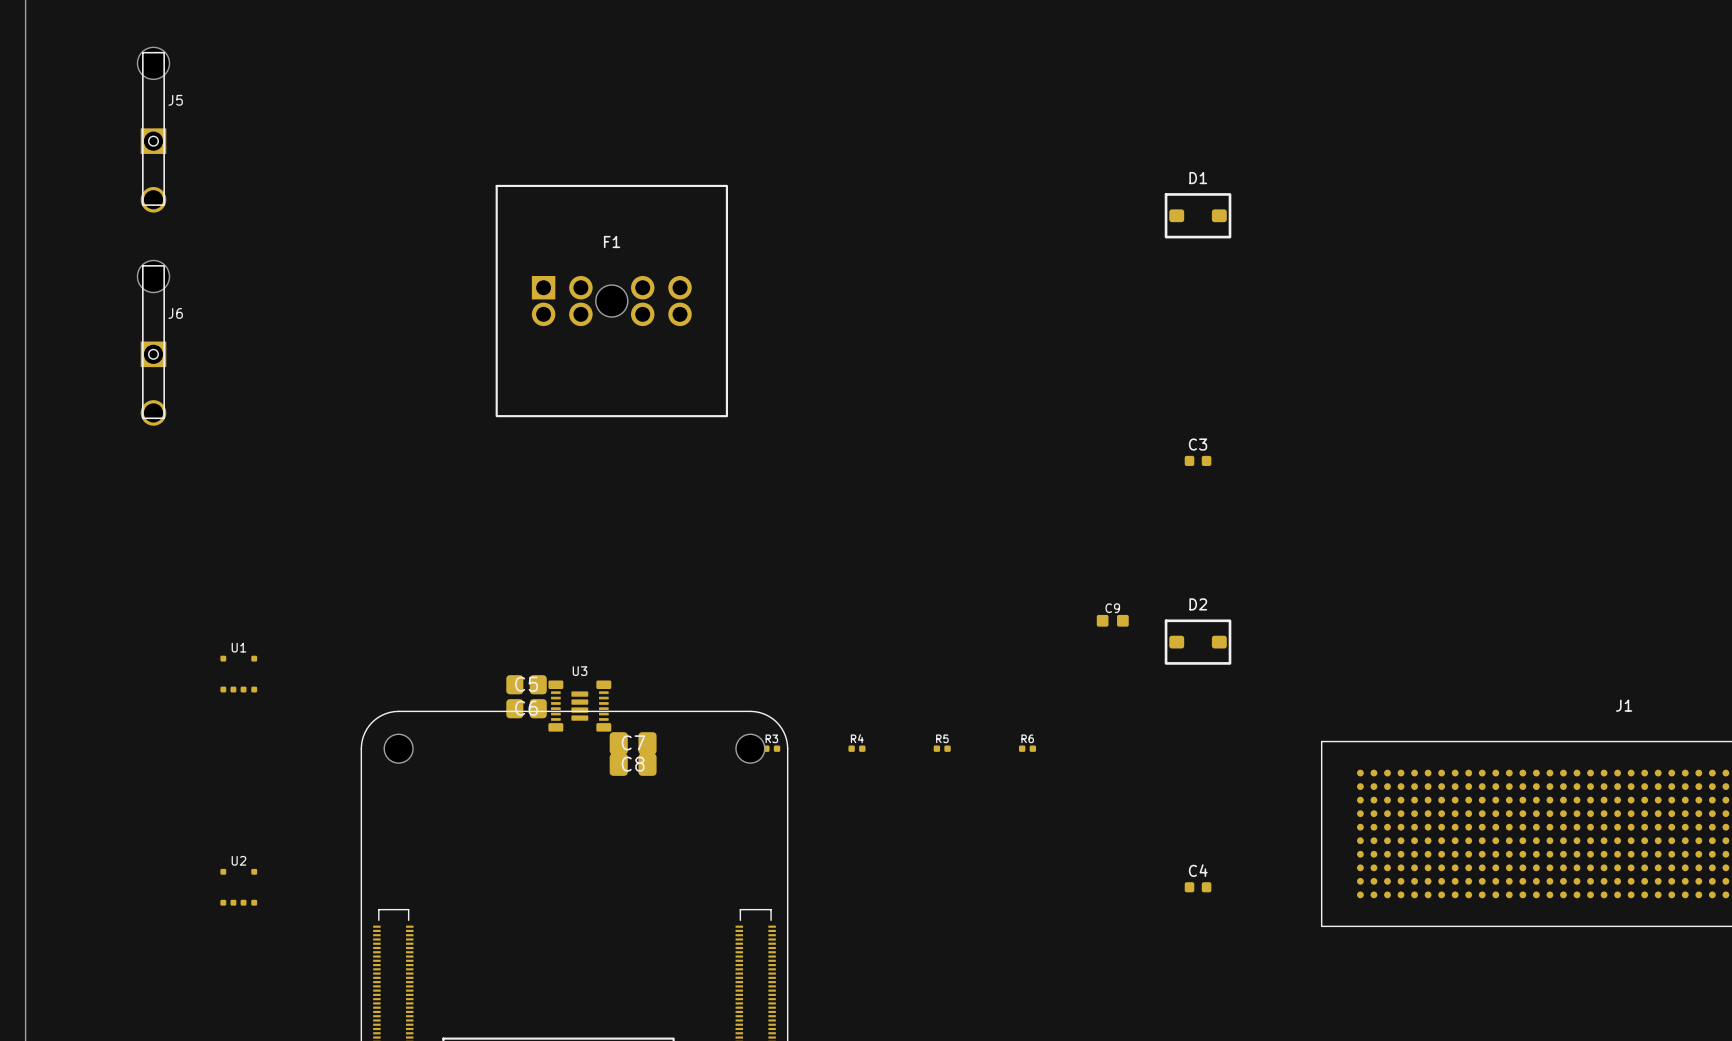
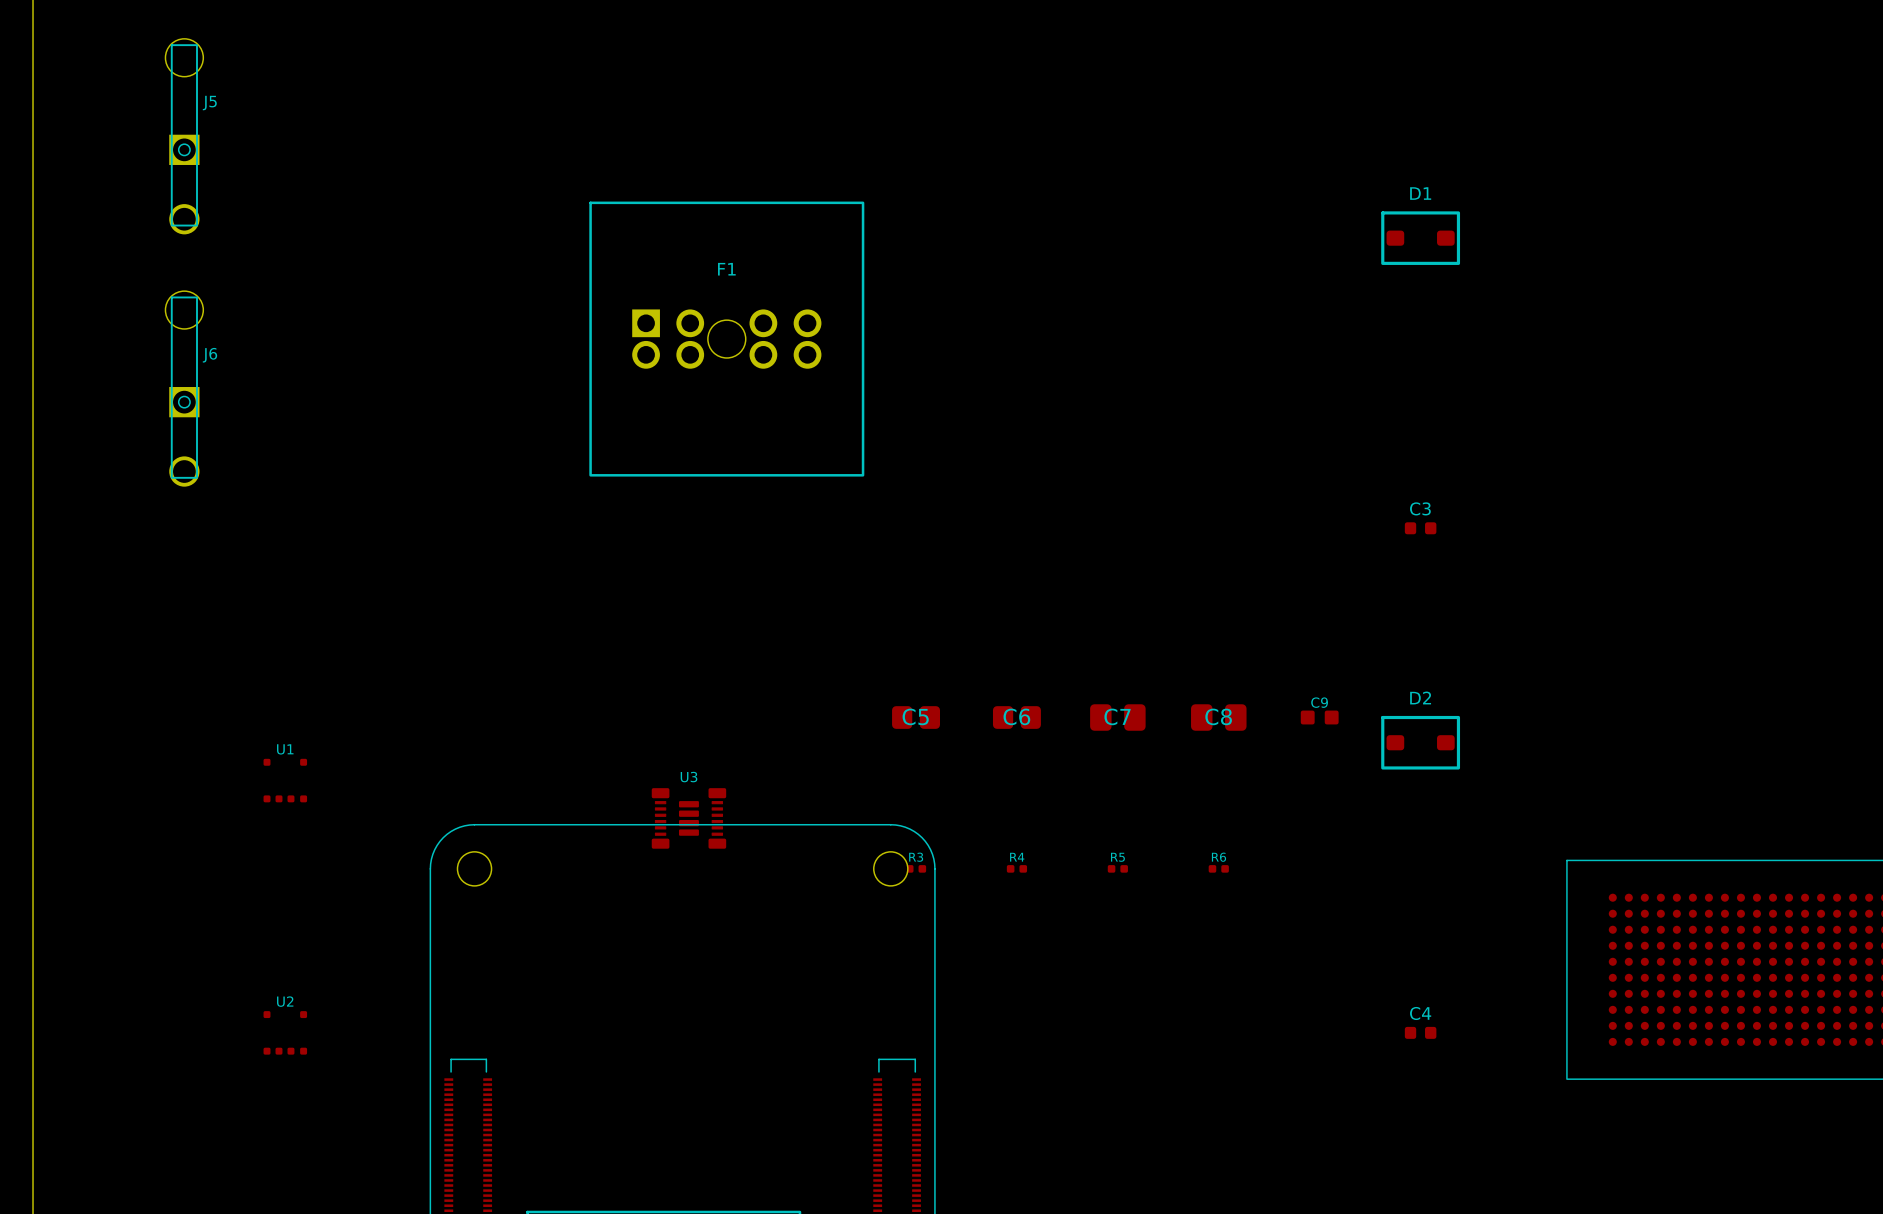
C5 position: (526, 684) -> (916, 717)
C6 position: (526, 708) -> (1016, 717)
C7 position: (633, 743) -> (1117, 717)
C8 position: (633, 764) -> (1218, 717)

